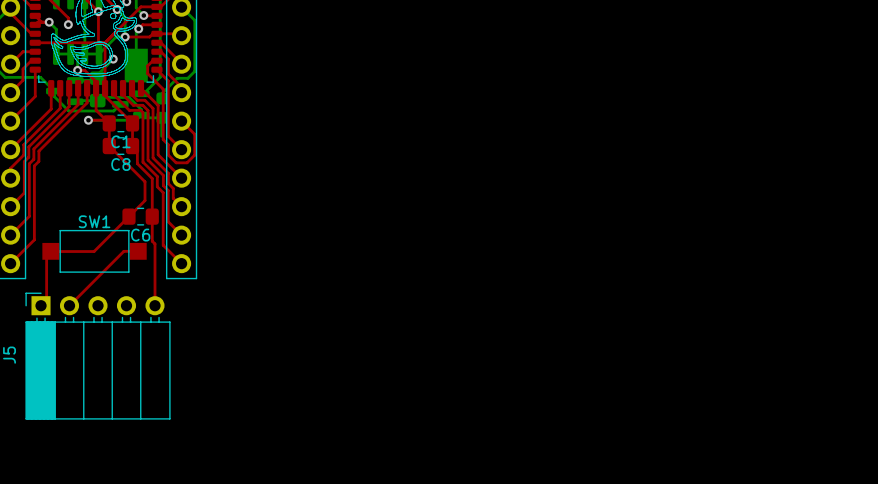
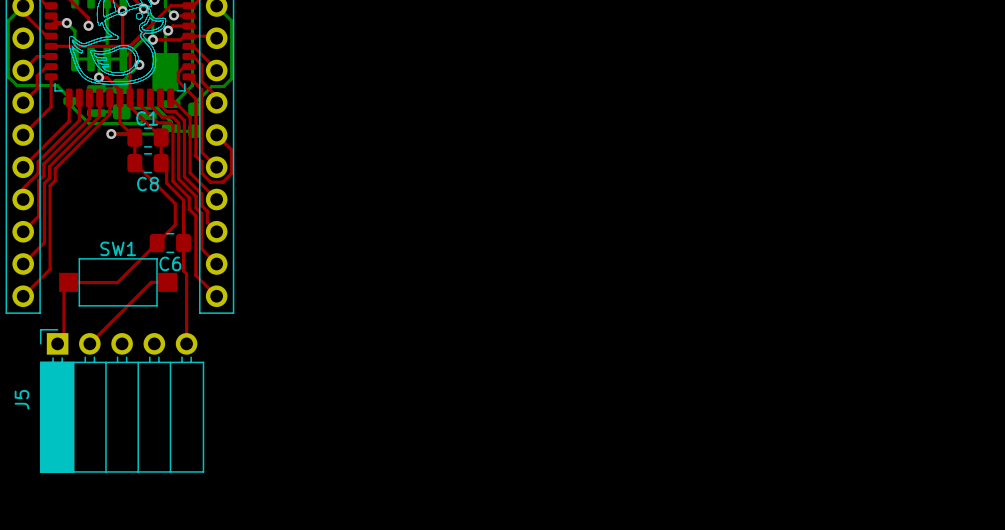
bottom track: (161, 117) (161, 136) -> none
C1 name position: C1 (120, 141) -> C1 (147, 118)

